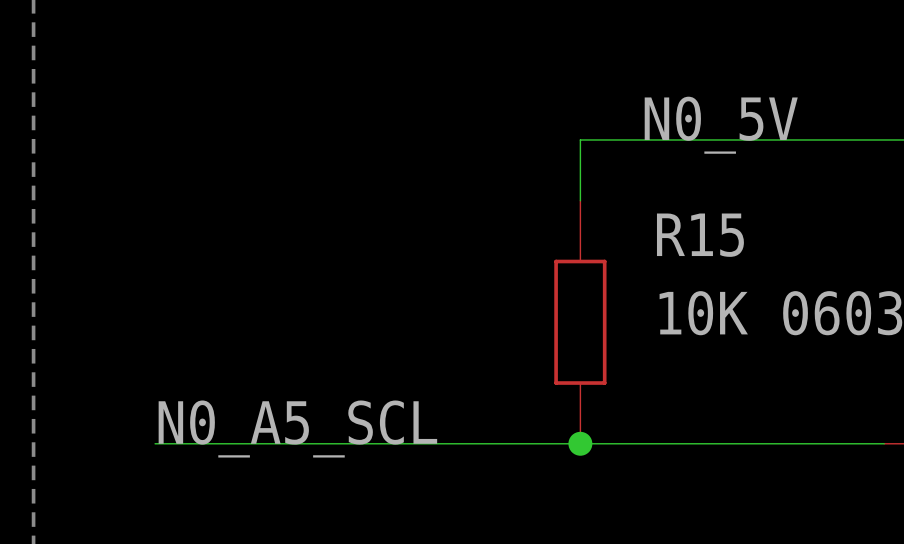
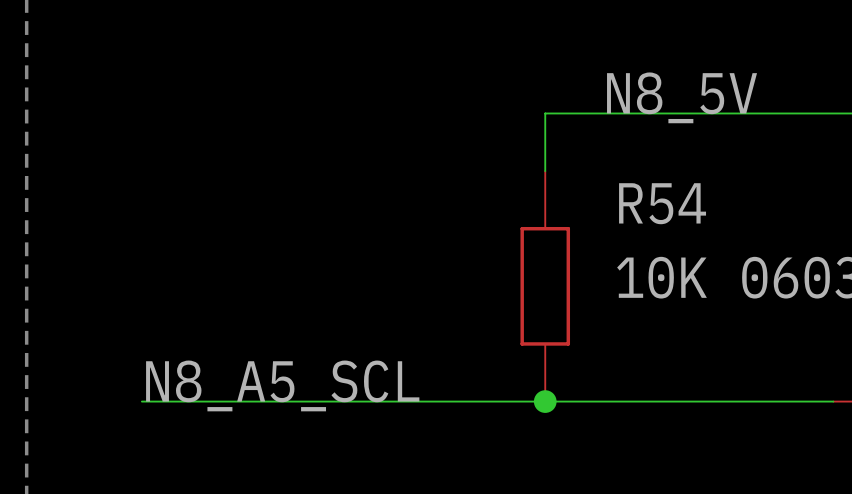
label: N0_5V (721, 125) -> N8_5V (682, 97)
R15 name: R15 (700, 235) -> R54 (662, 203)
label: N0_A5_SCL (297, 429) -> N8_A5_SCL (282, 385)

